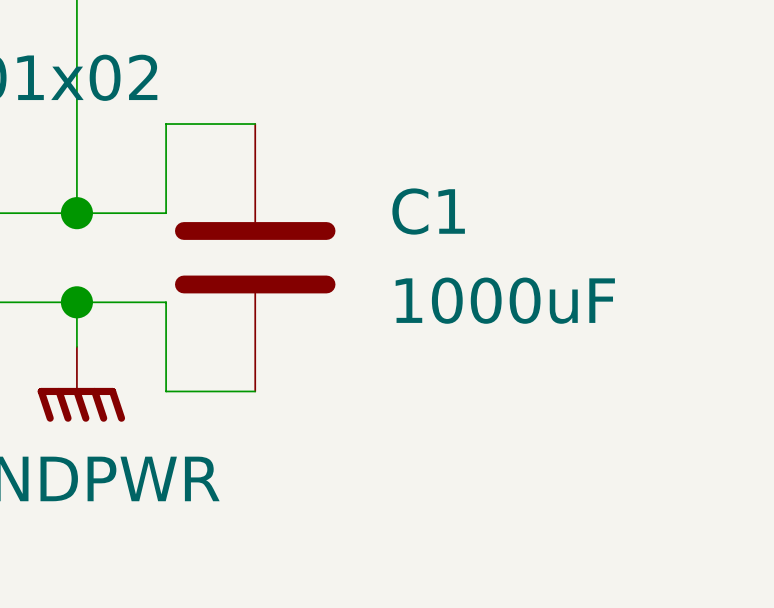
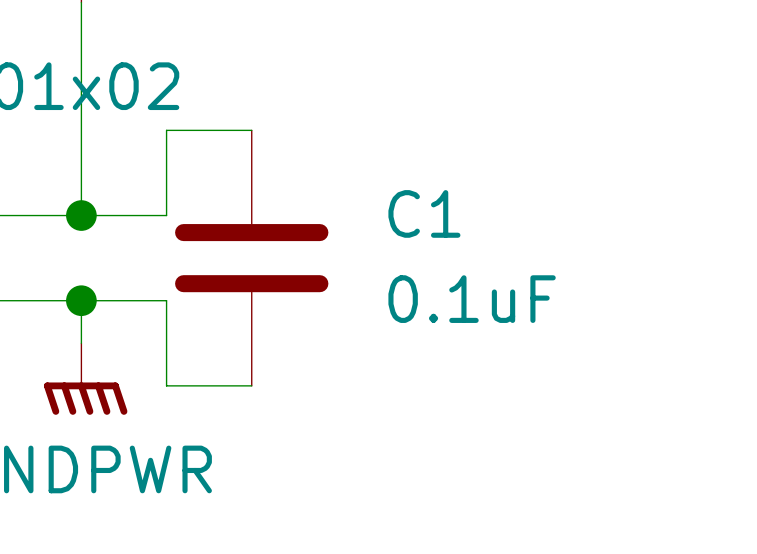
C1 value: 1000uF (505, 300) -> 0.1uF (472, 299)

